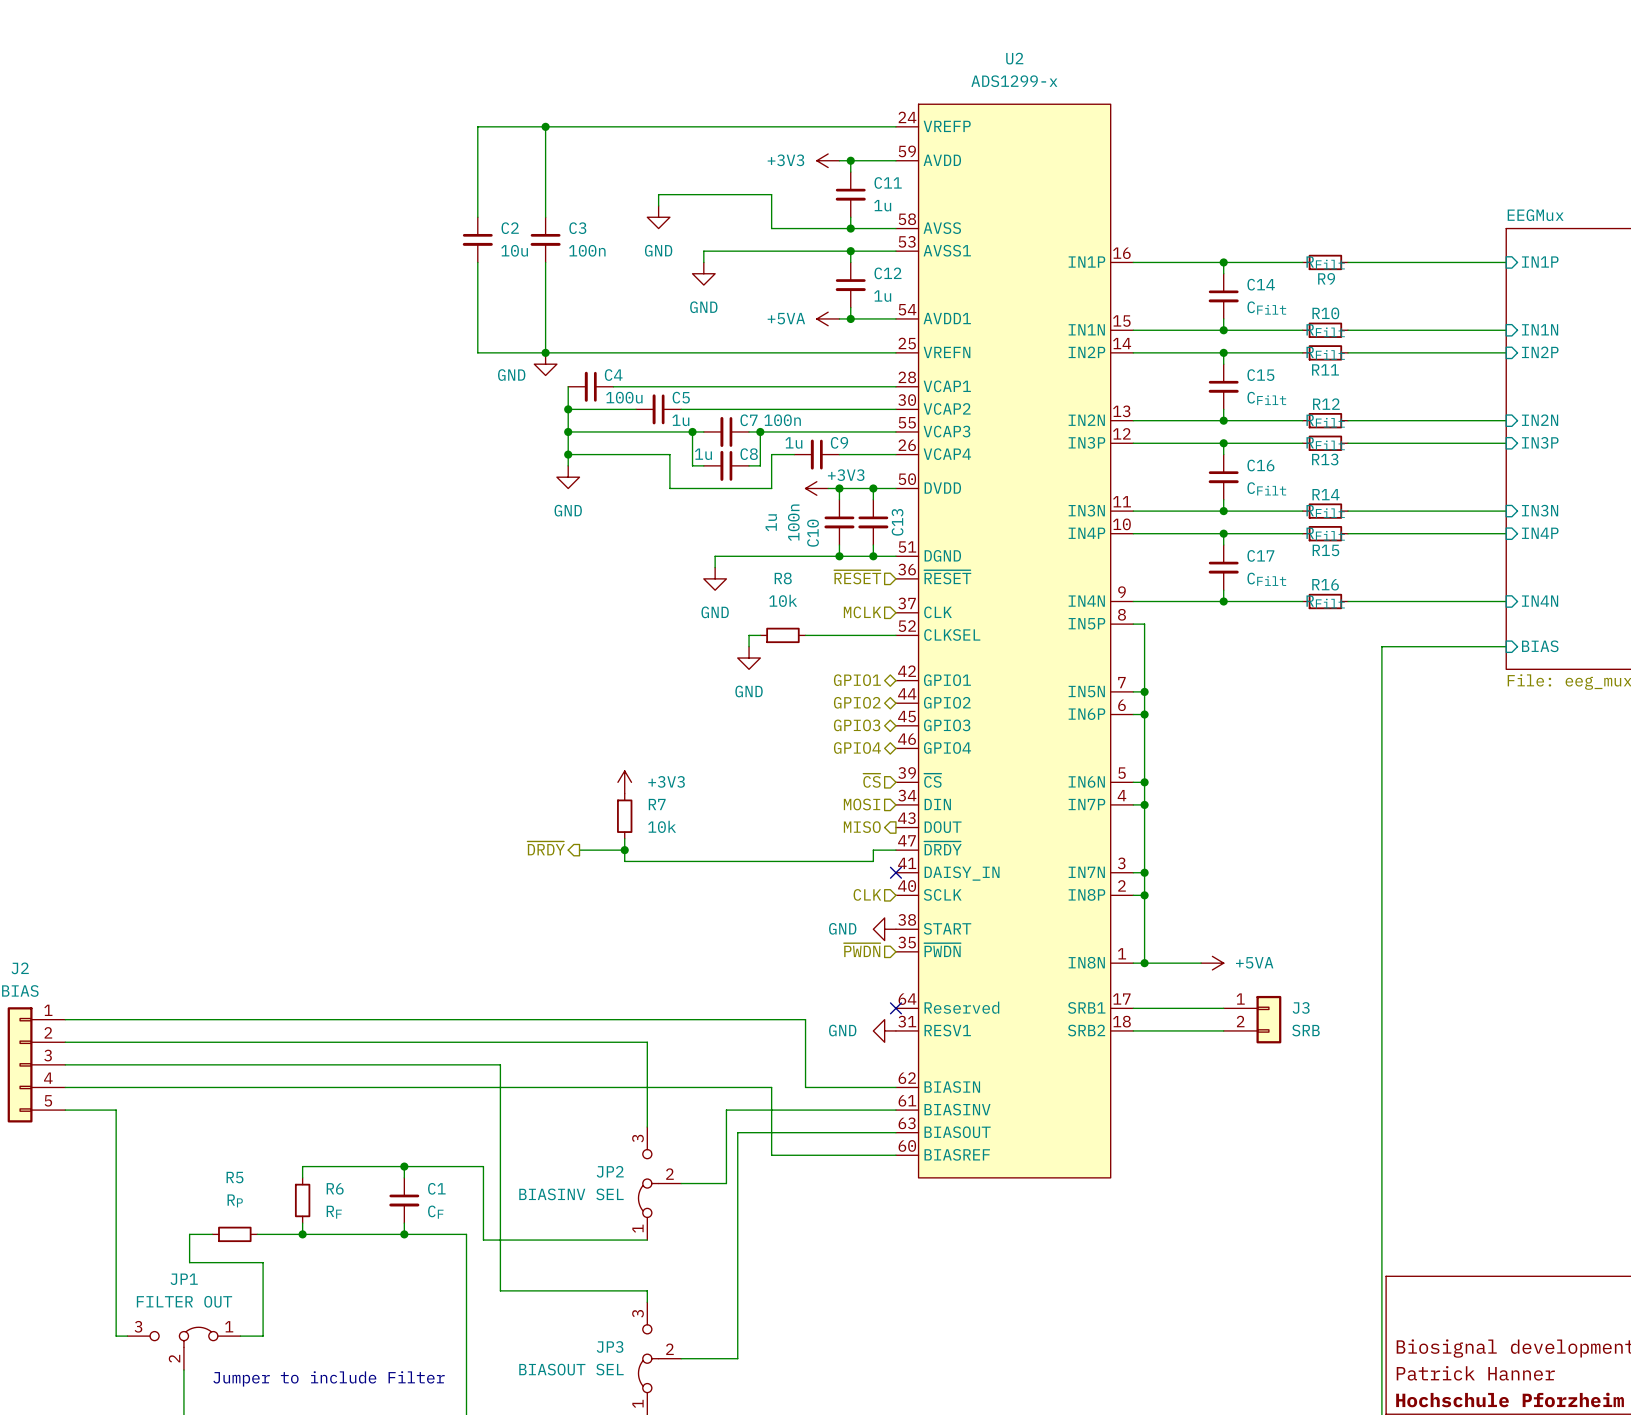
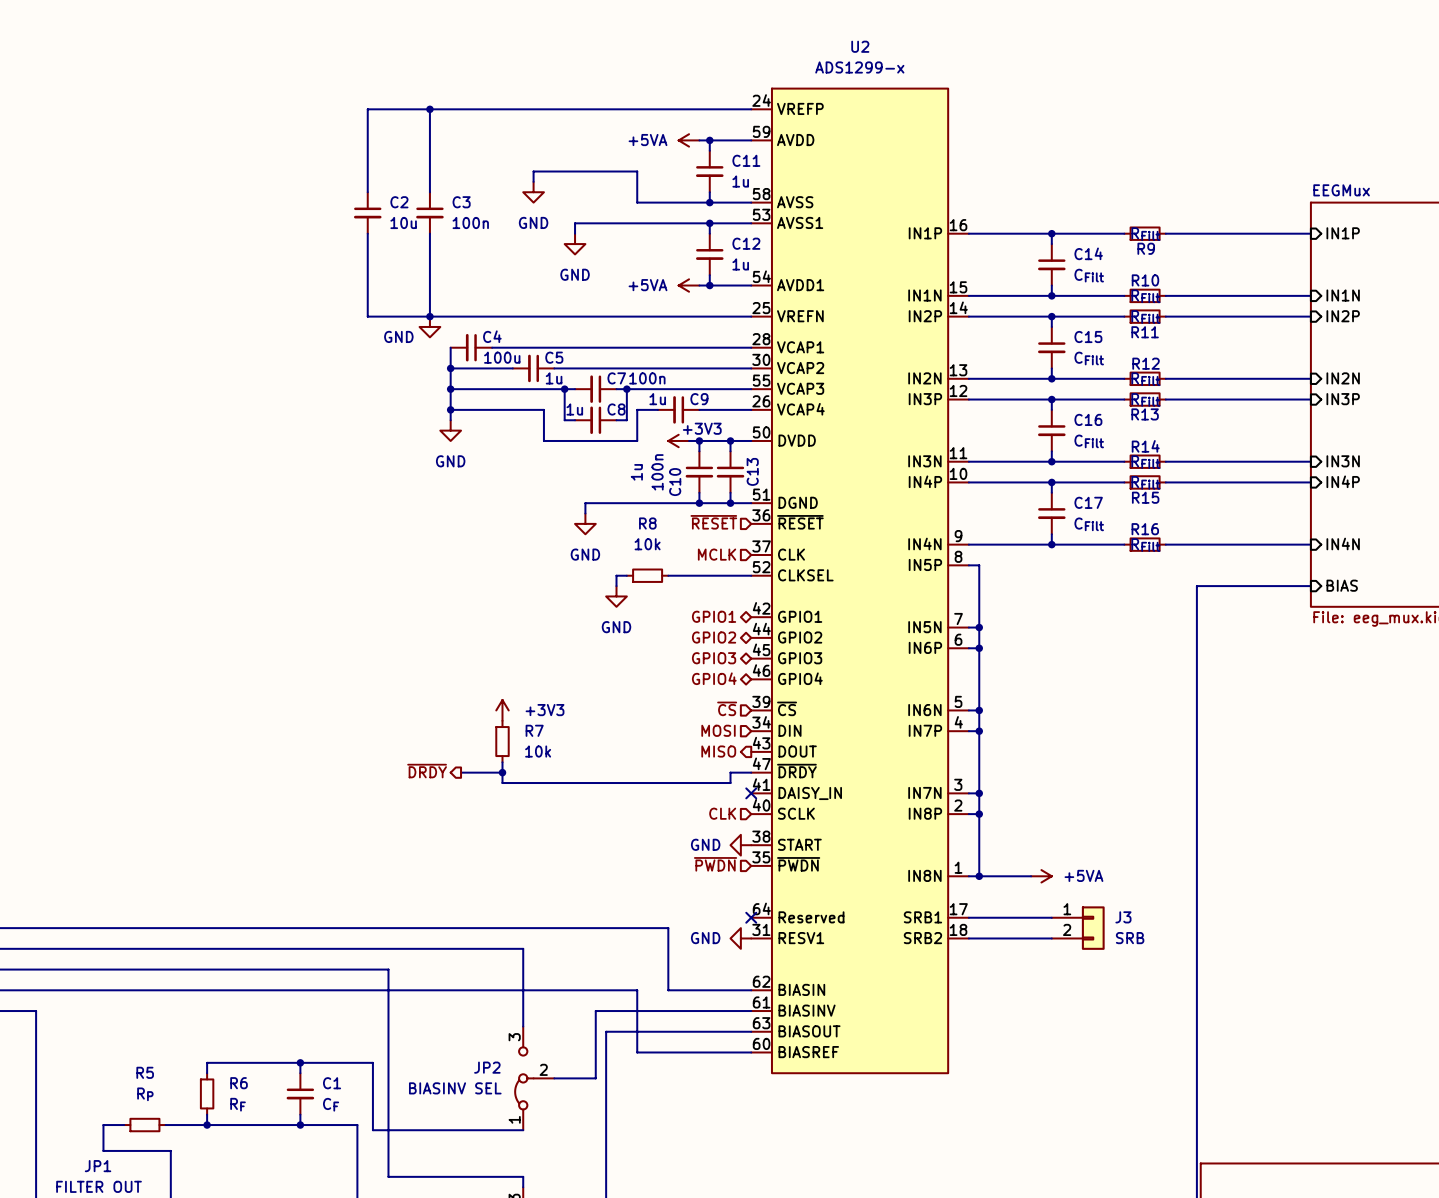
power symbol: +3V3 (828, 160) -> +5VA (689, 140)

